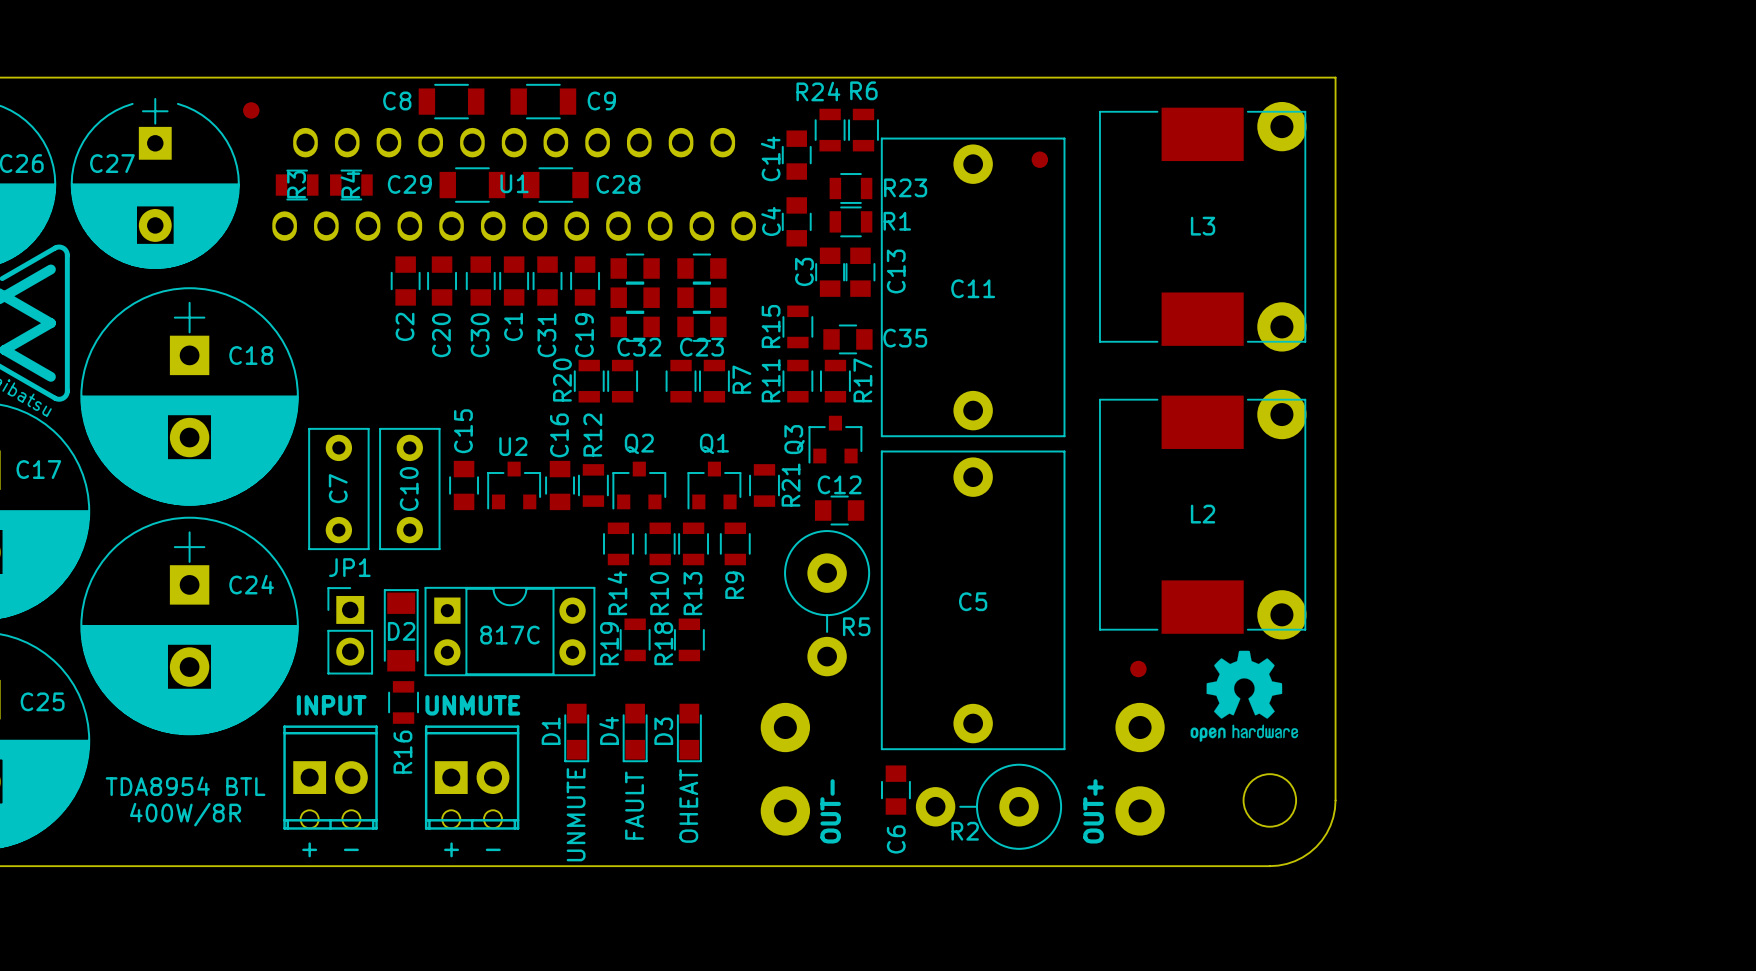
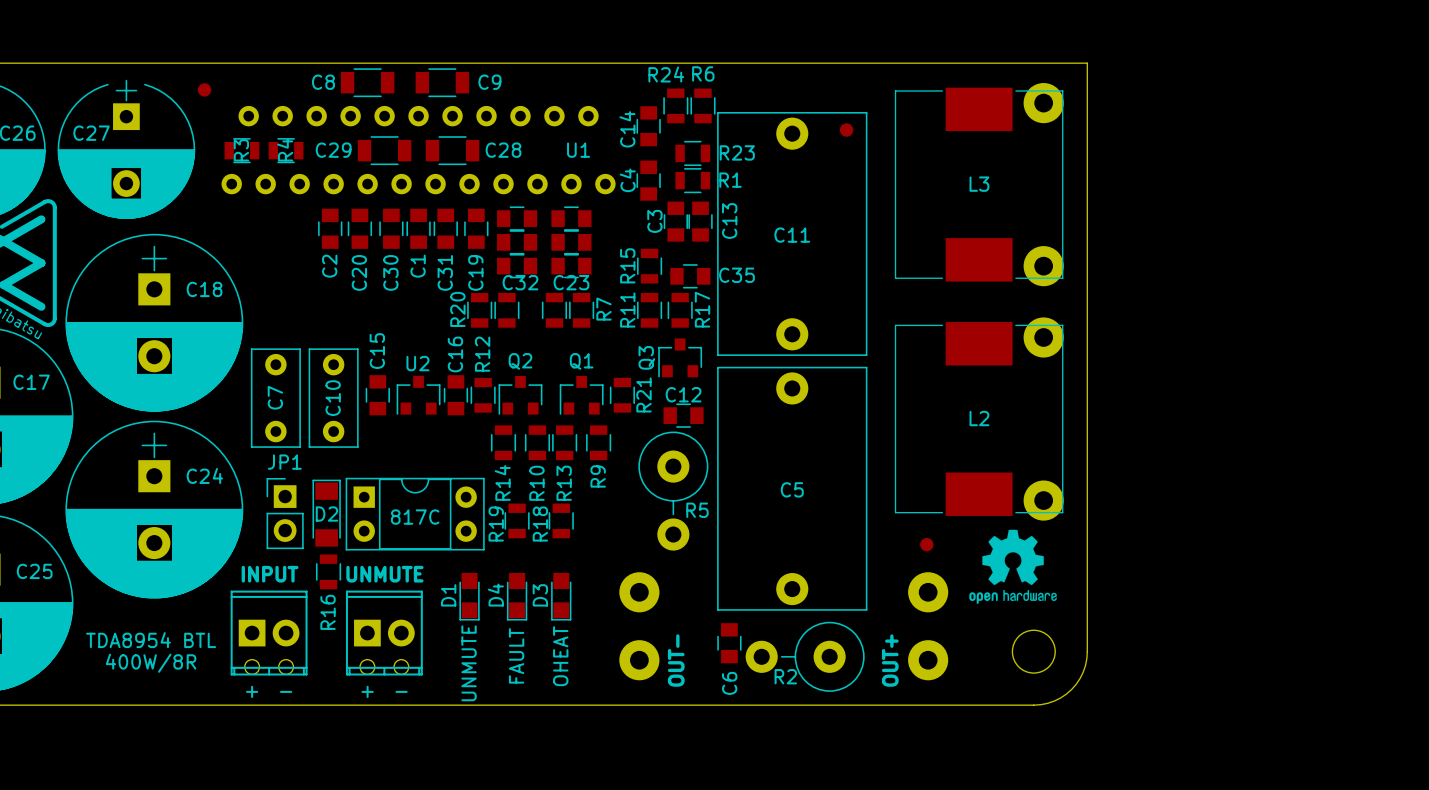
U1 footprint: [272, 127, 756, 241] -> [221, 105, 616, 195]
U1 name position: U1 (514, 183) -> U1 (578, 150)

